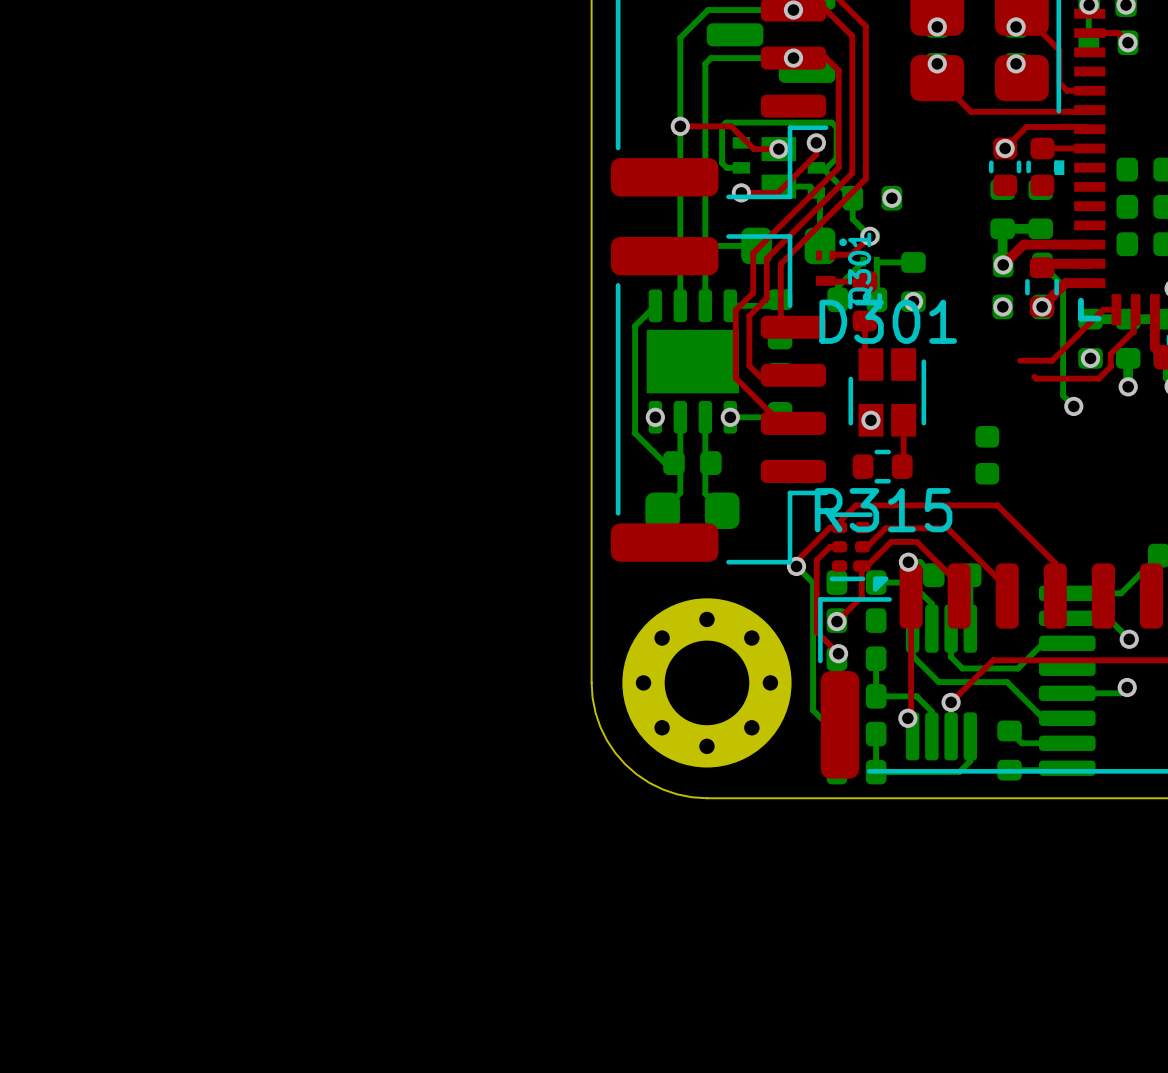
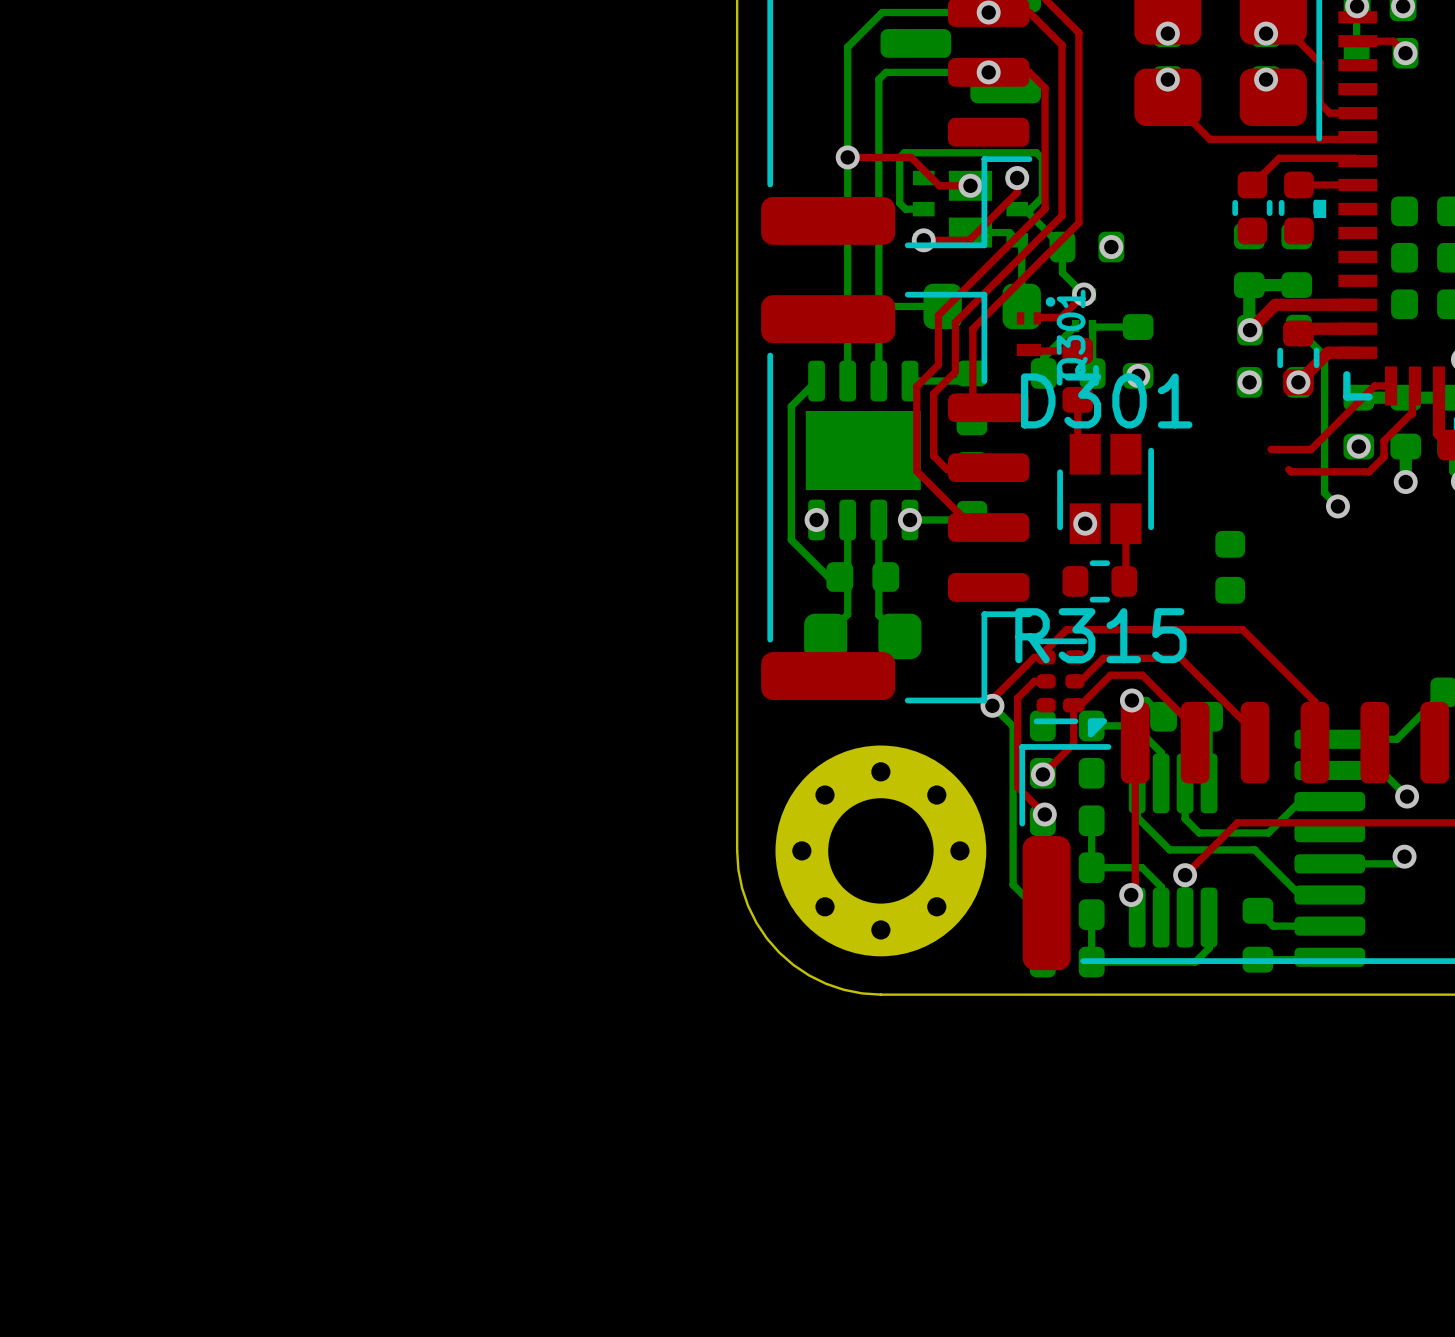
via: (1005, 148) -> none

